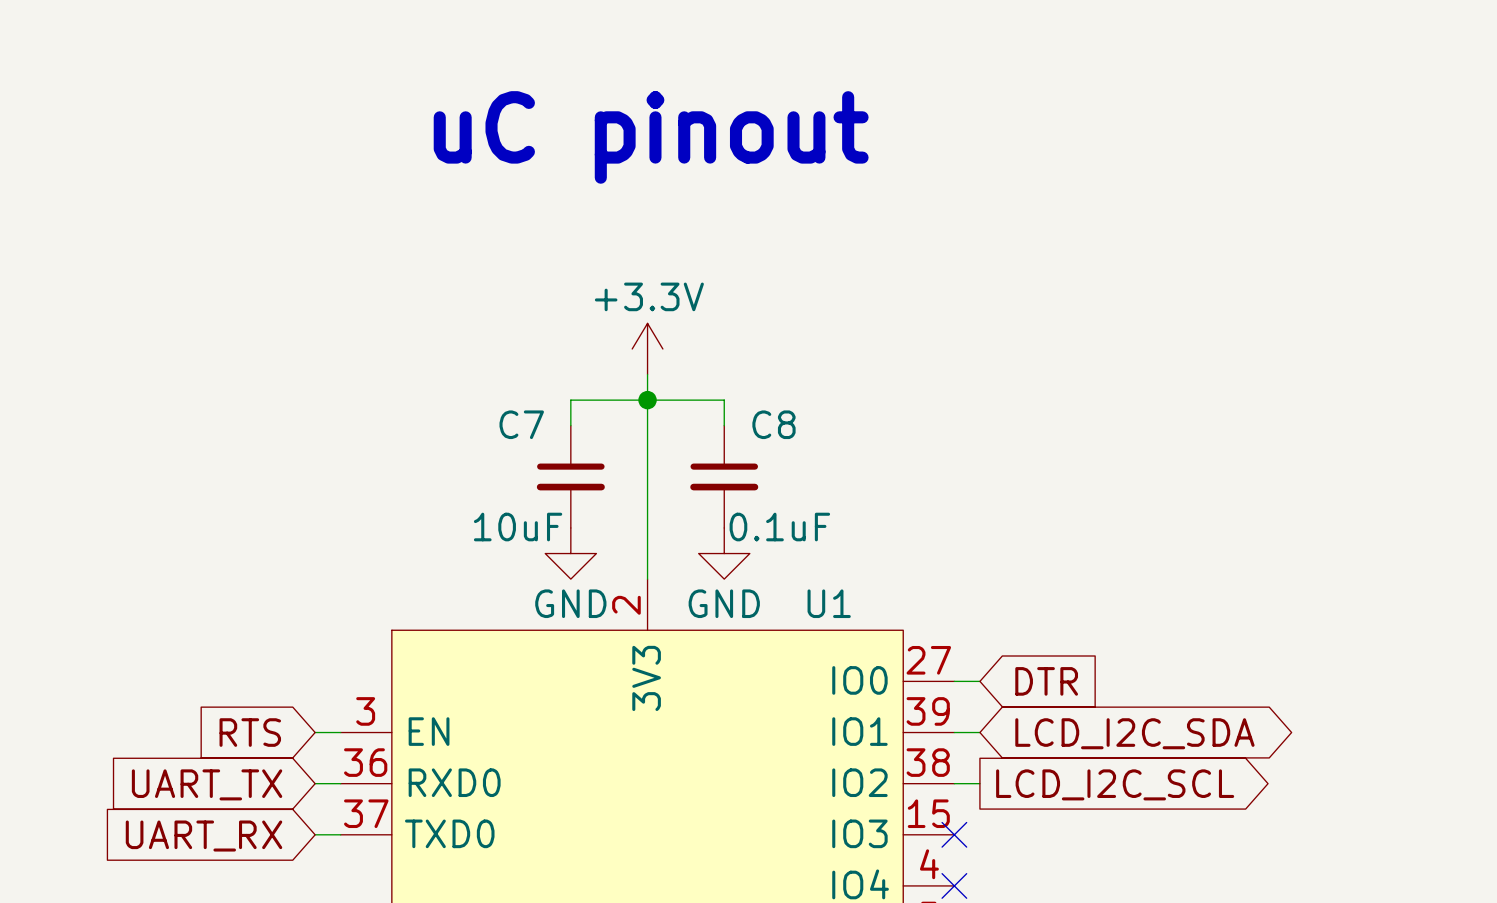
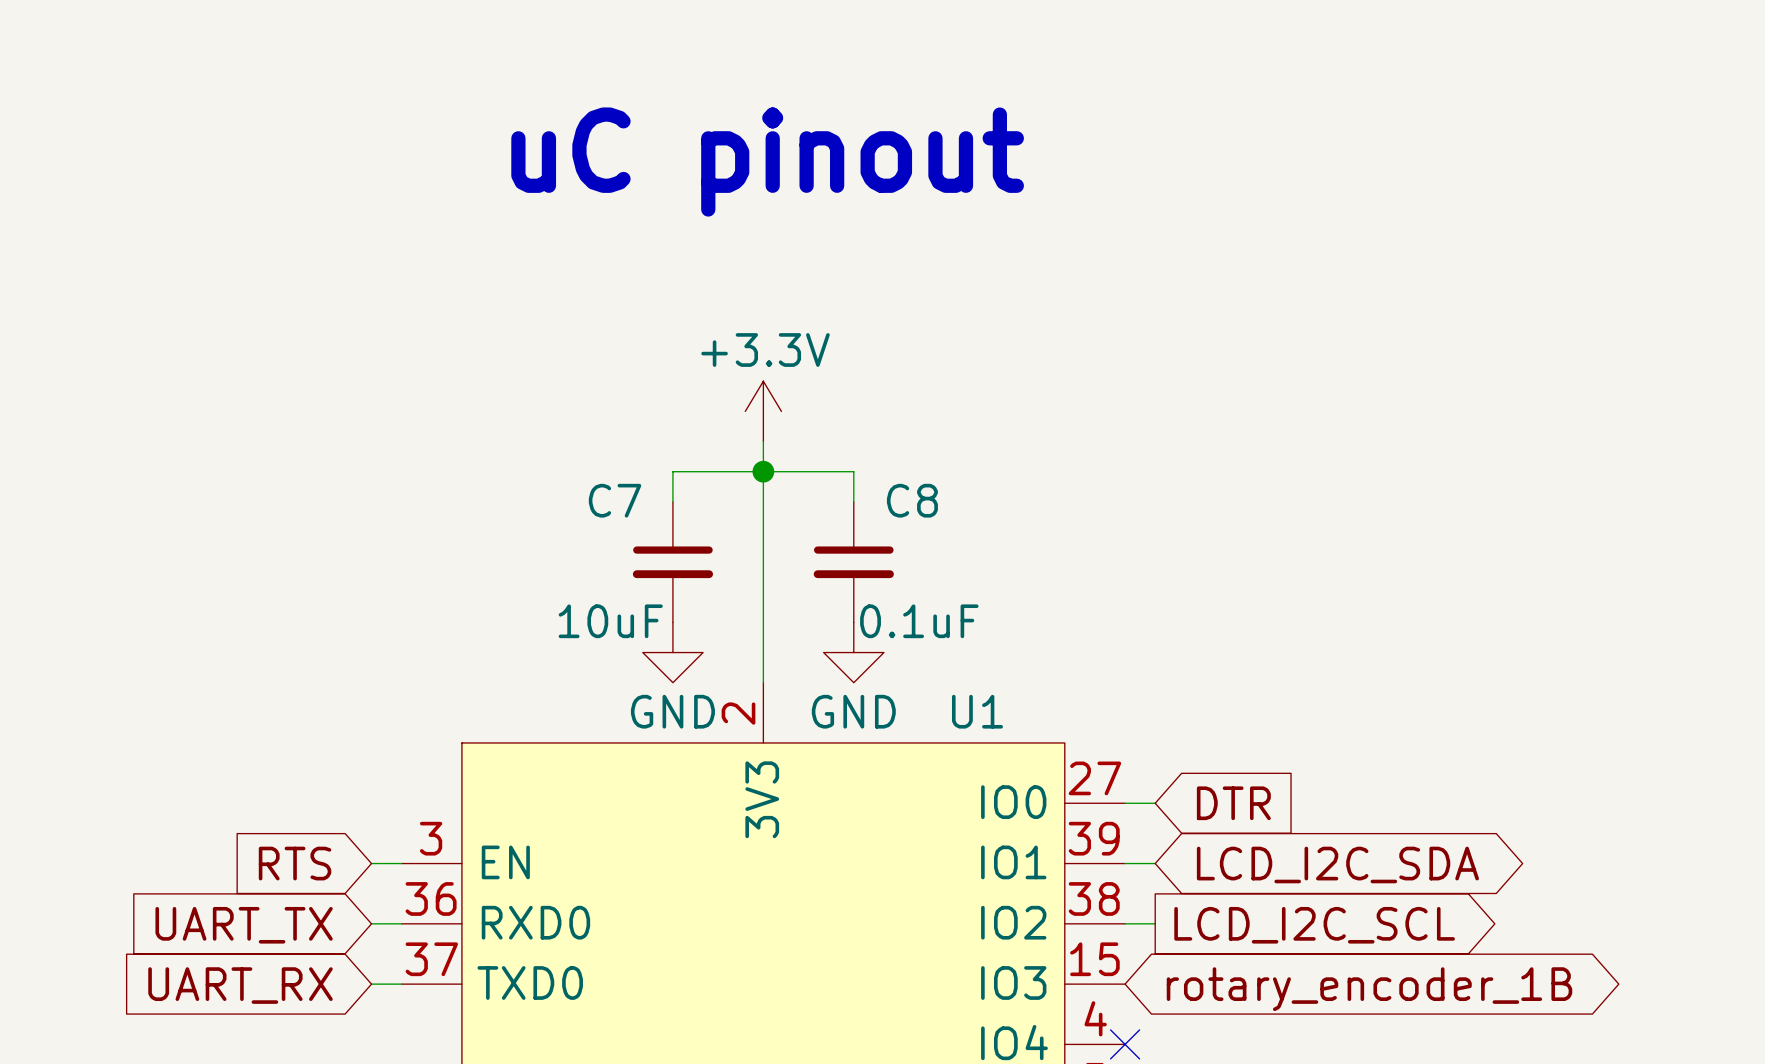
no-connect mark: (954, 834) -> none
global label: none -> rotary_encoder_1B (1369, 989)

